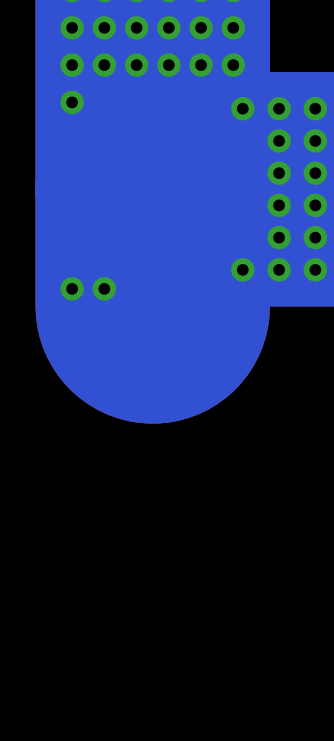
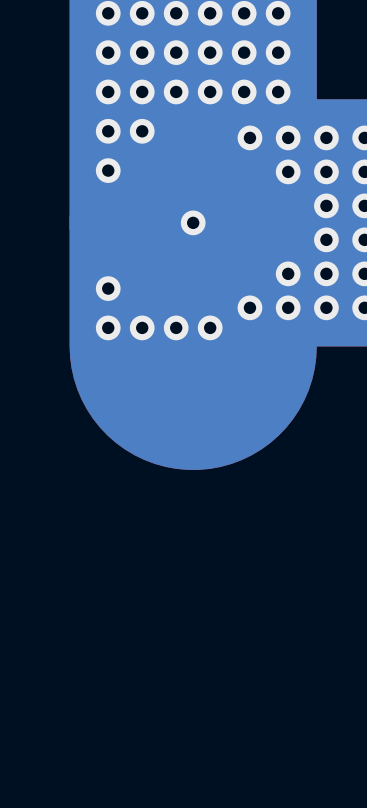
via: none -> (142, 131)
via: none -> (249, 137)
via: none -> (108, 170)
via: none -> (288, 171)
via: none -> (193, 222)
via: none -> (288, 273)
via: none -> (108, 288)
via: none -> (249, 307)
via: none -> (176, 327)
via: none -> (210, 327)

